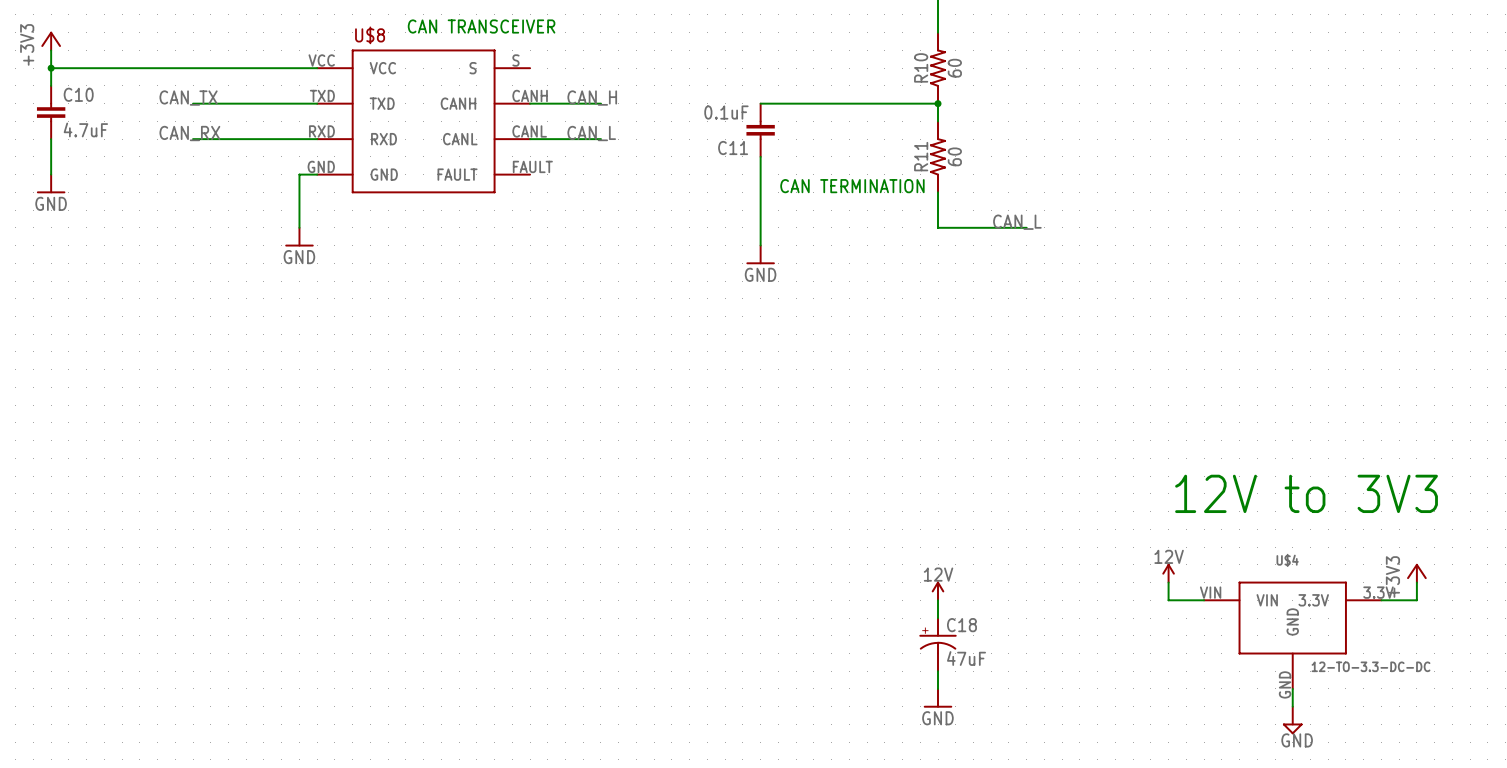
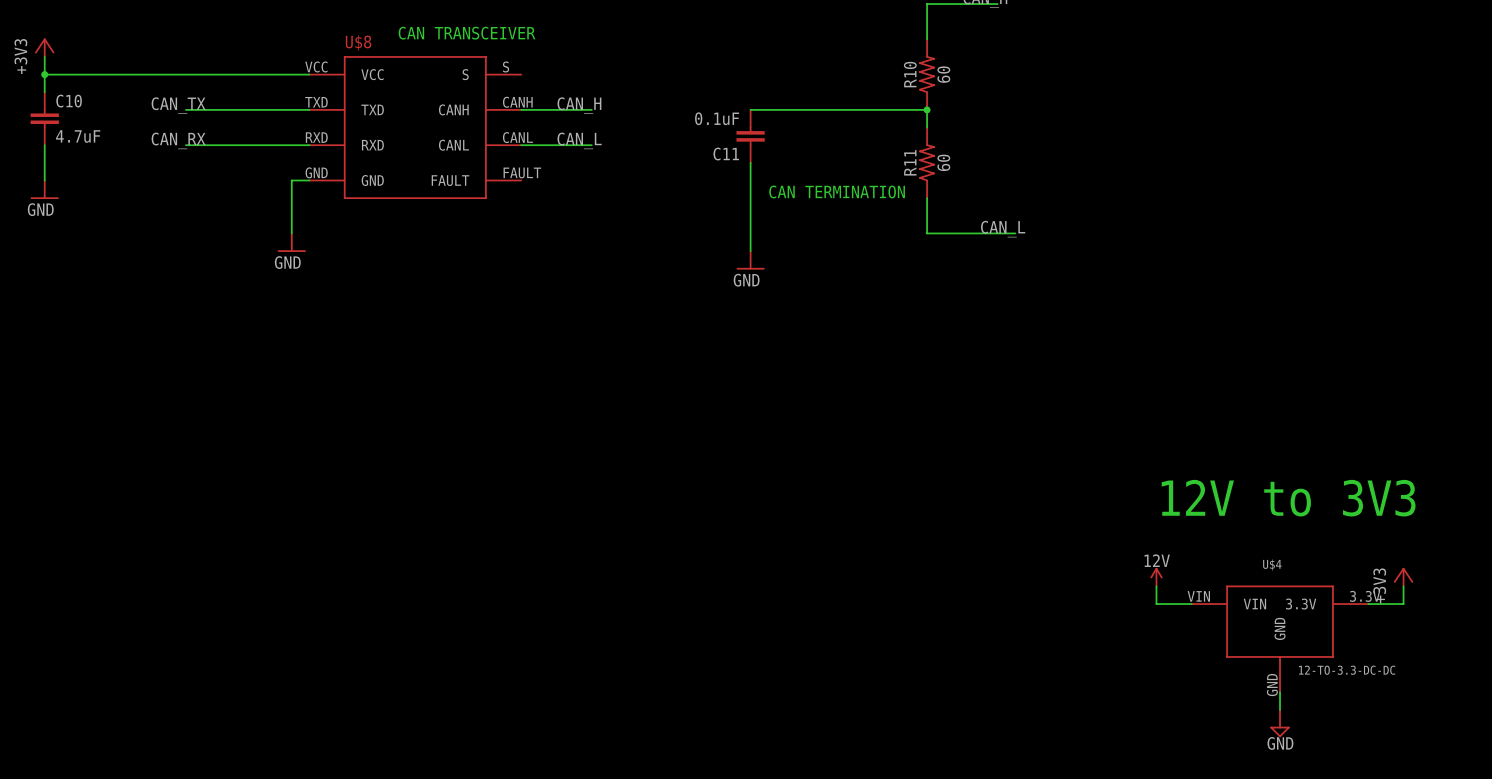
power symbol: 12V (938, 590) -> none
wire: (938, 600) (938, 618) -> none
C18: 47uF (938, 644) -> none
wire: (938, 671) (938, 688) -> none
power symbol: GND (938, 698) -> none

